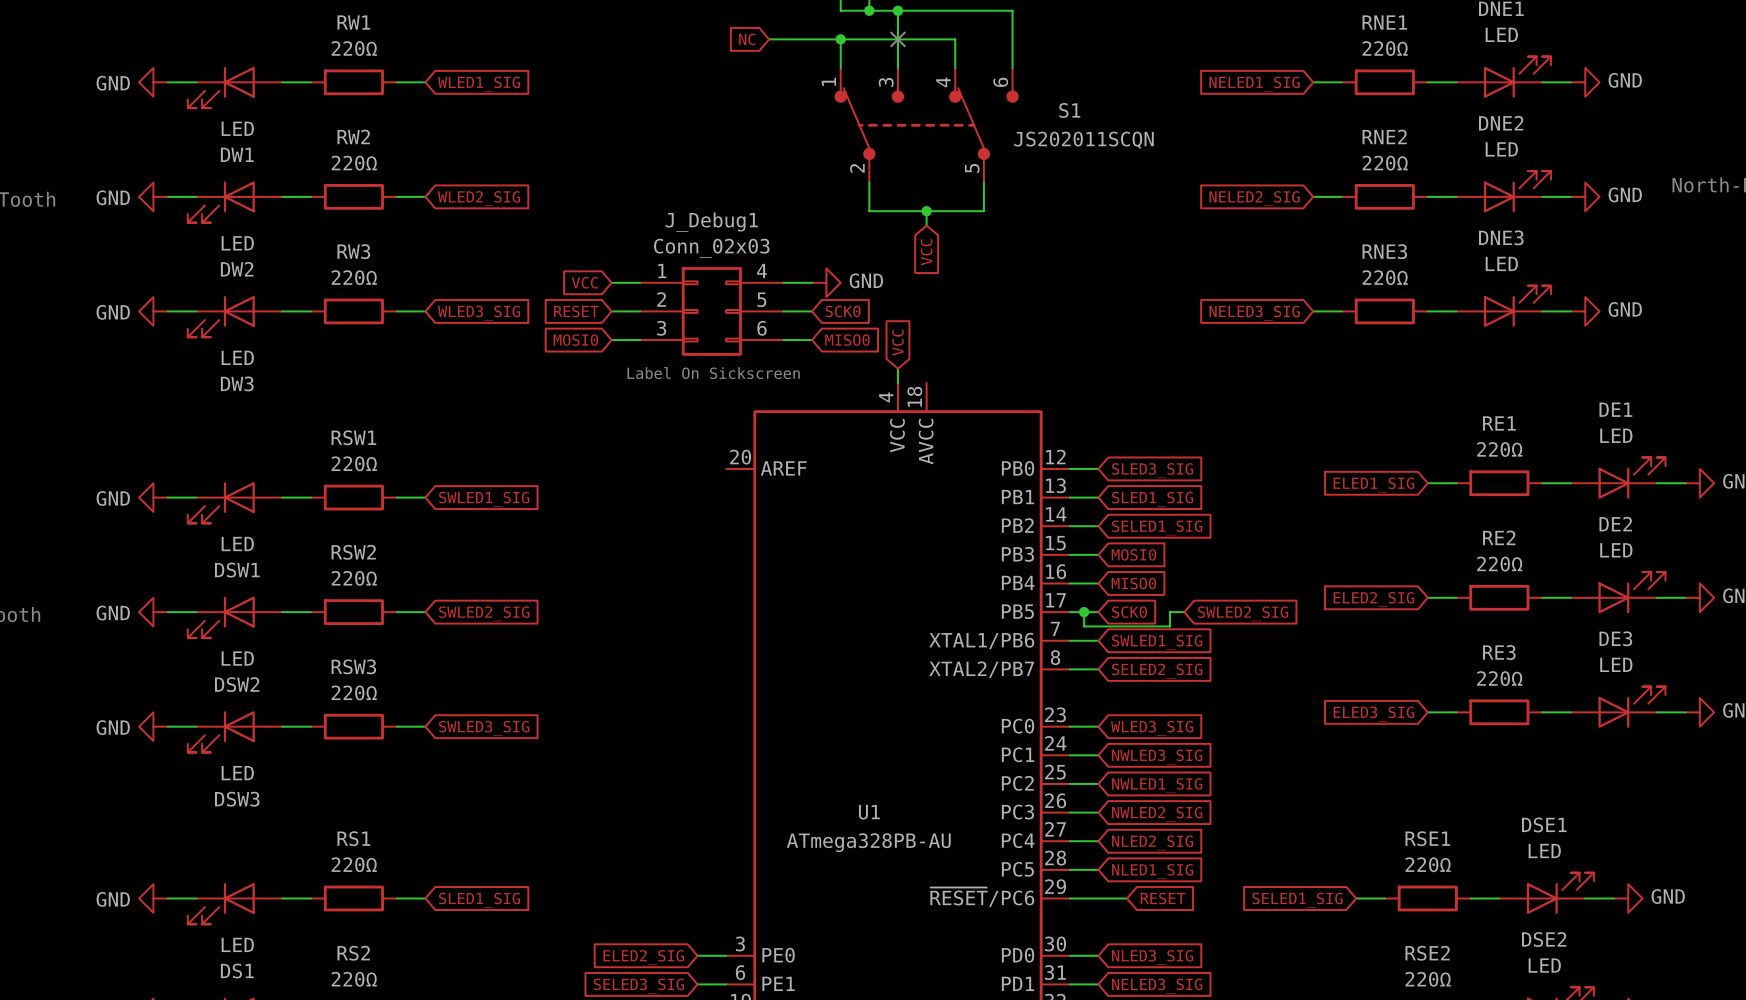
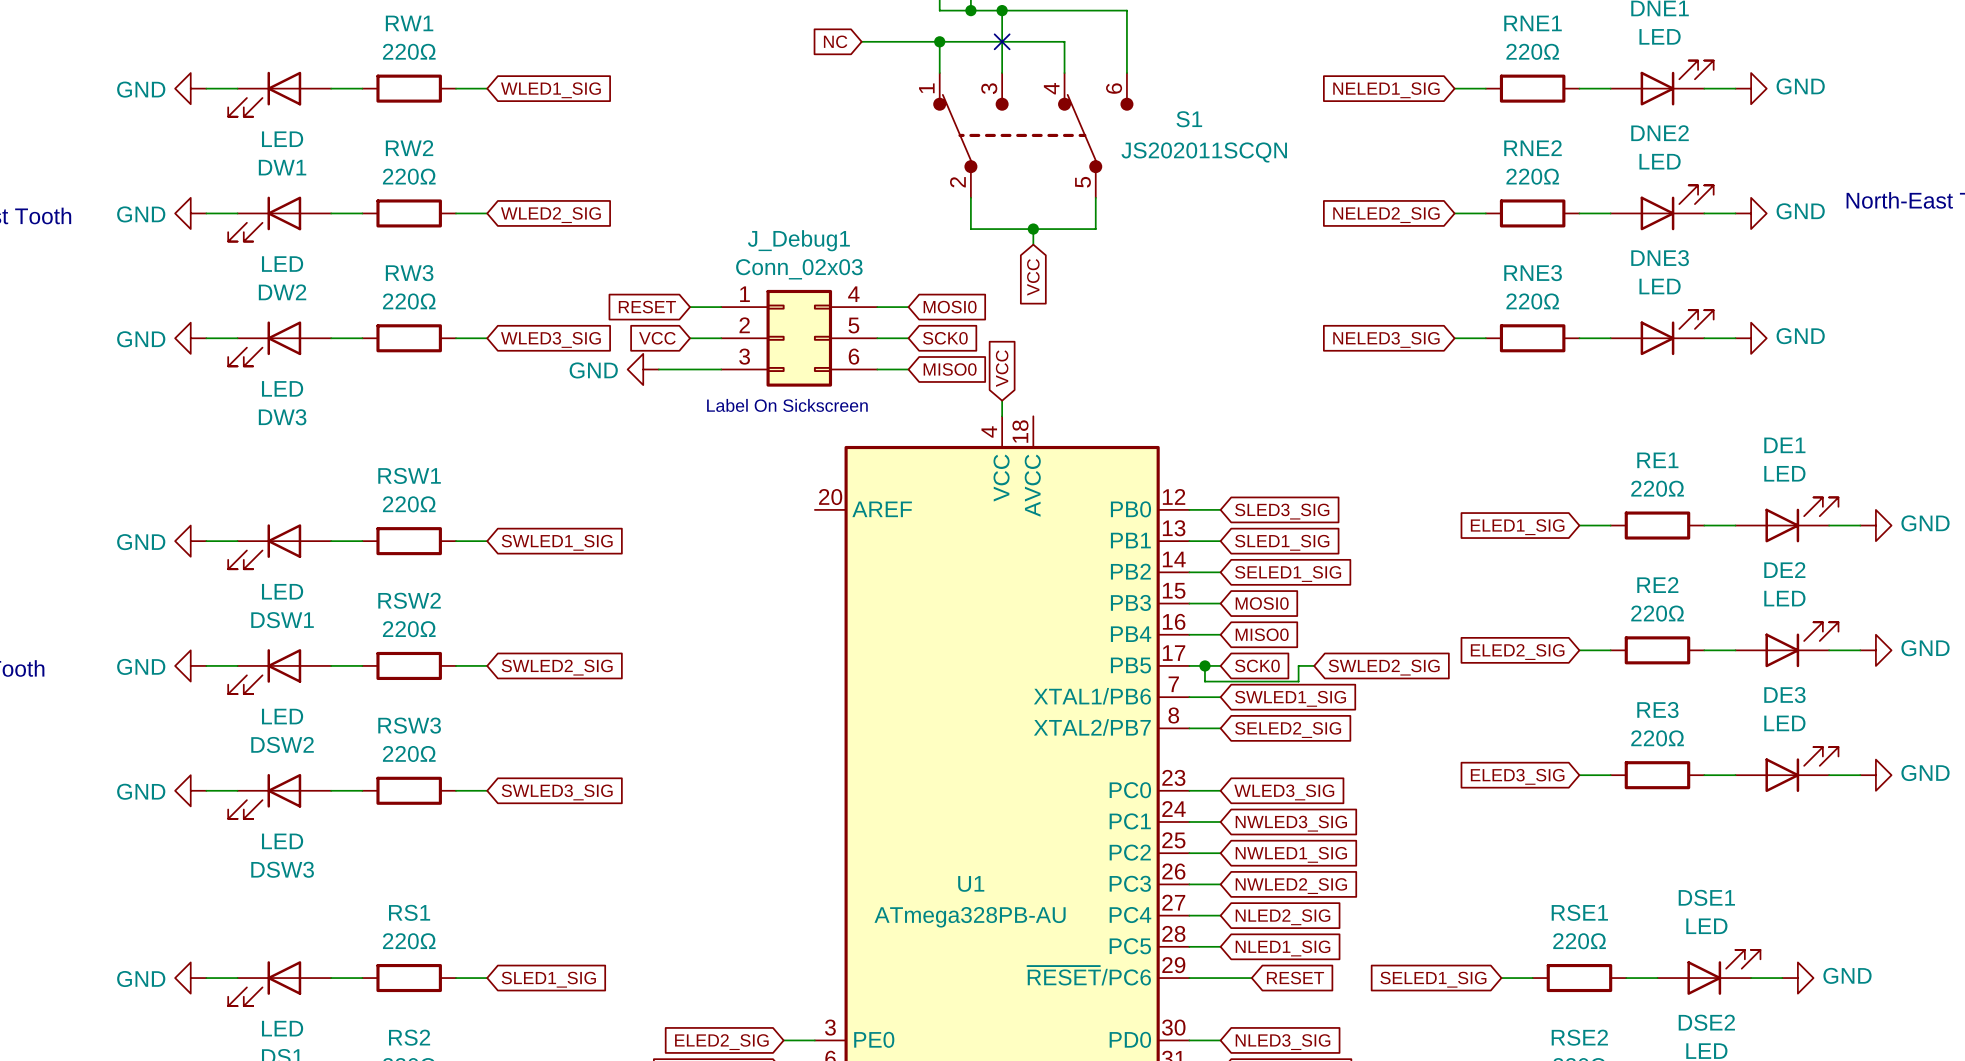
global label: VCC (584, 282) -> RESET (647, 307)
power symbol rotation: 0° (826, 282) -> 180° (643, 369)
power symbol position: GND (826, 282) -> GND (643, 369)
global label: RESET (576, 311) -> VCC (657, 338)
global label rotation: 0° (575, 340) -> 180° (950, 307)
global label position: MOSI0 (575, 340) -> MOSI0 (950, 307)
wire: none -> (658, 369) (690, 369)

